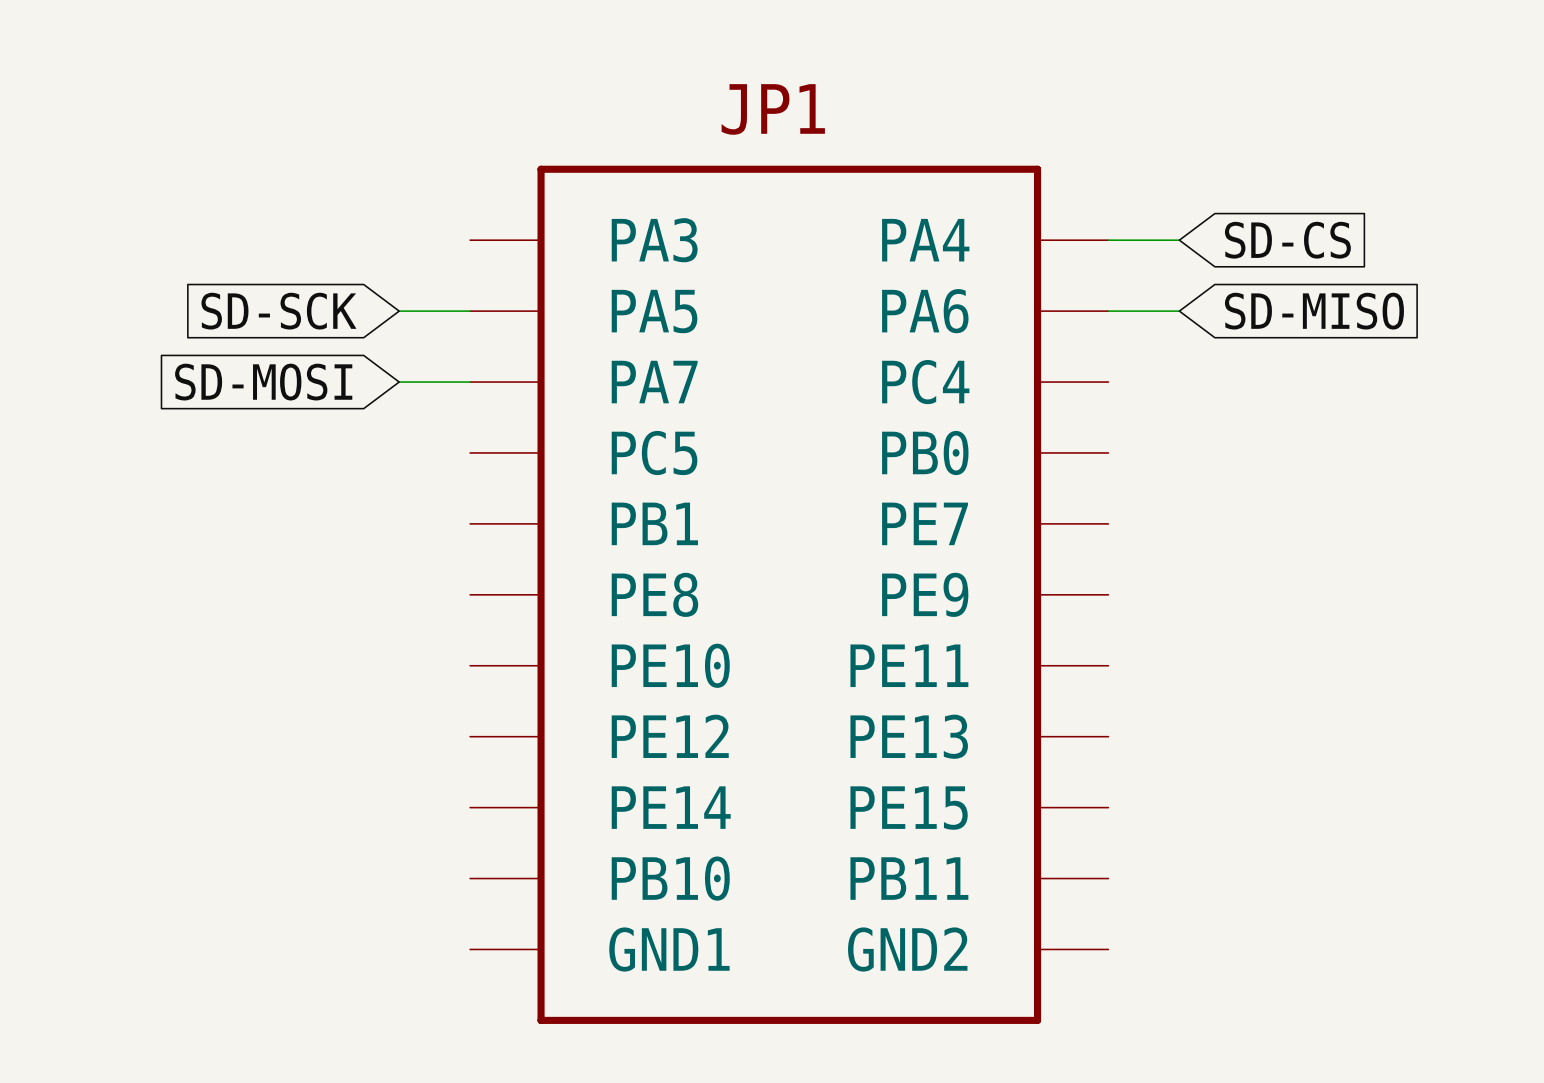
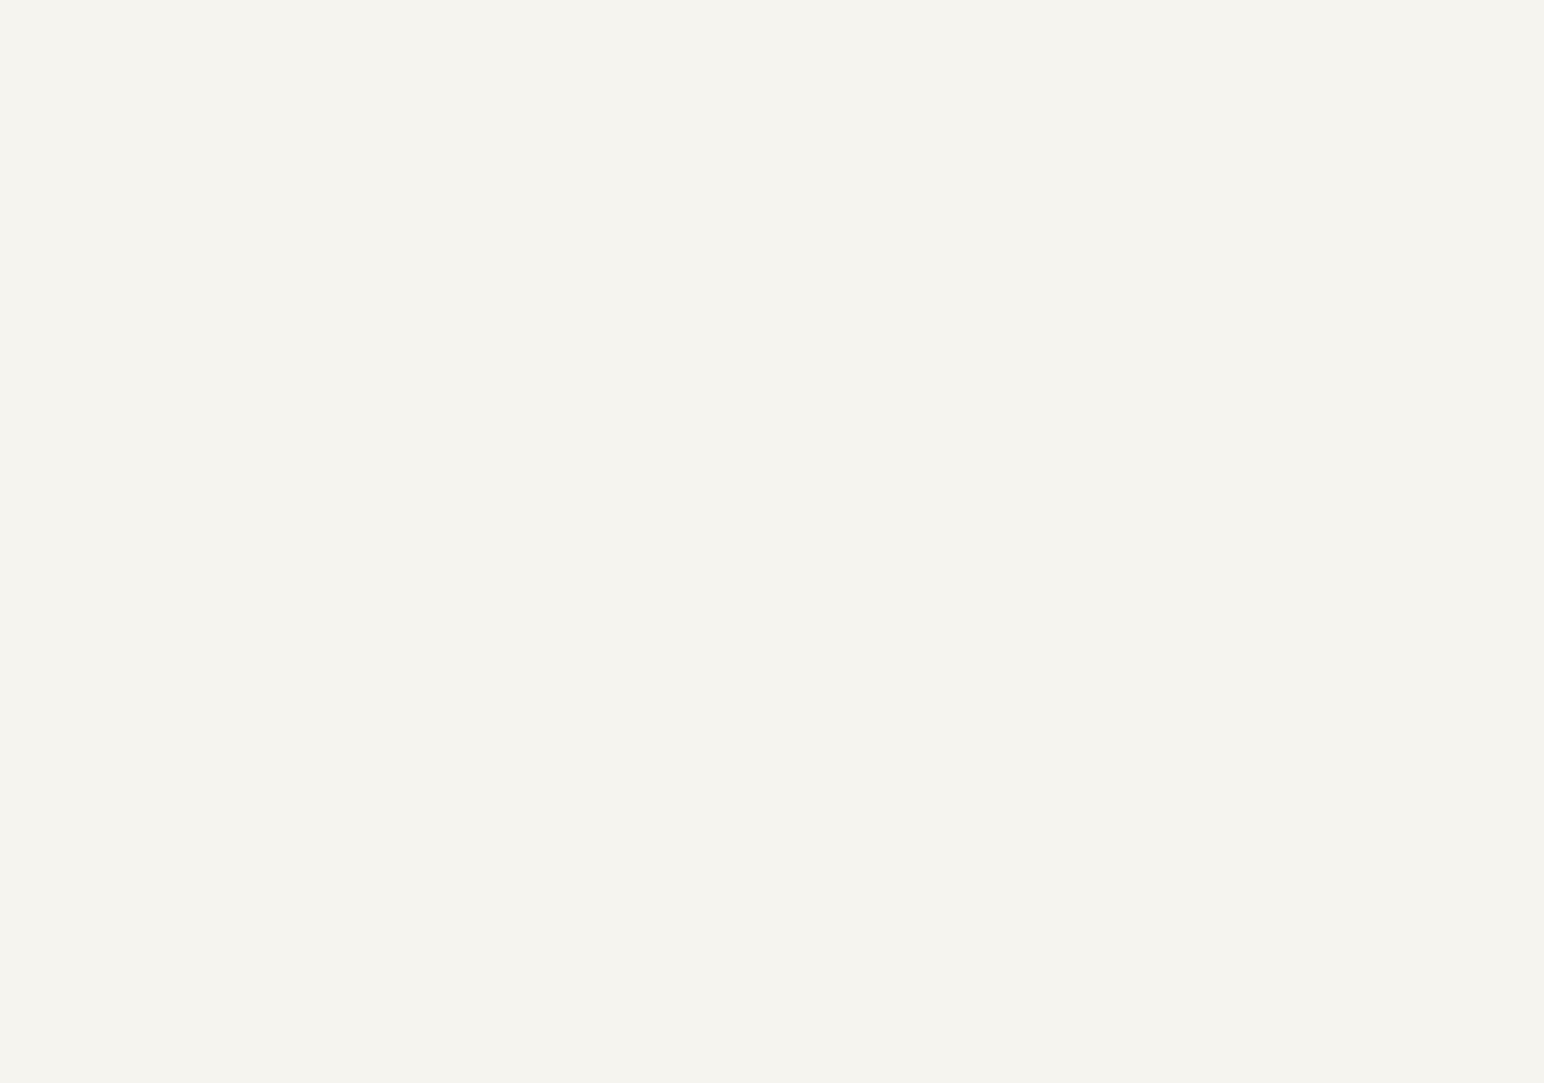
wire: (1108, 240) (1179, 240) -> none
global label: SD-CS (1287, 240) -> none
global label: SD-SCK (278, 311) -> none
wire: (399, 311) (470, 311) -> none
wire: (1108, 311) (1179, 311) -> none
global label: SD-MISO (1314, 311) -> none
global label: SD-MOSI (263, 382) -> none
wire: (399, 382) (470, 382) -> none
part: (789, 594) -> none

